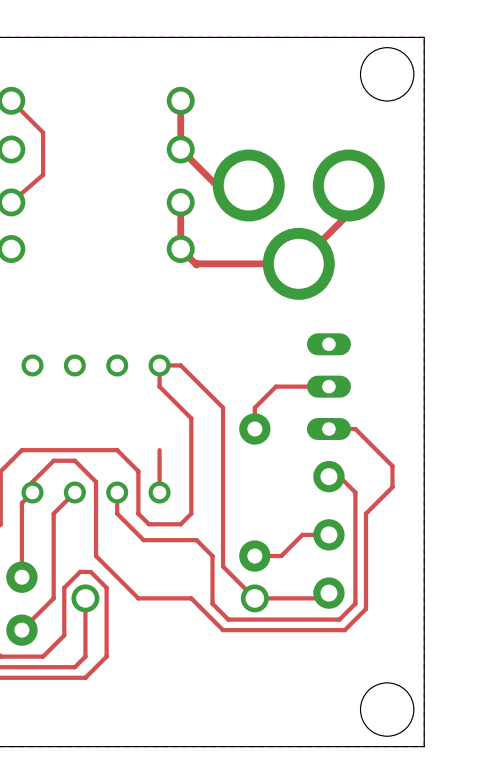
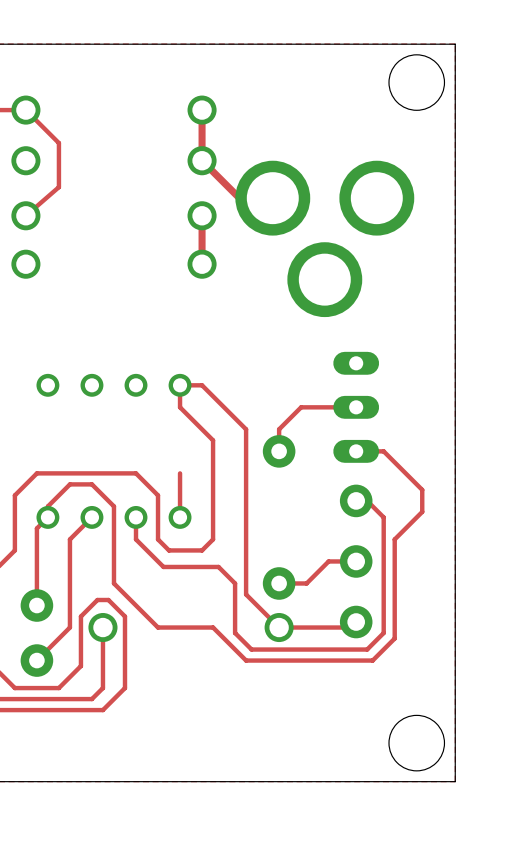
top track: (348, 185) (348, 213) (298, 263) (196, 264) (180, 249) -> none

